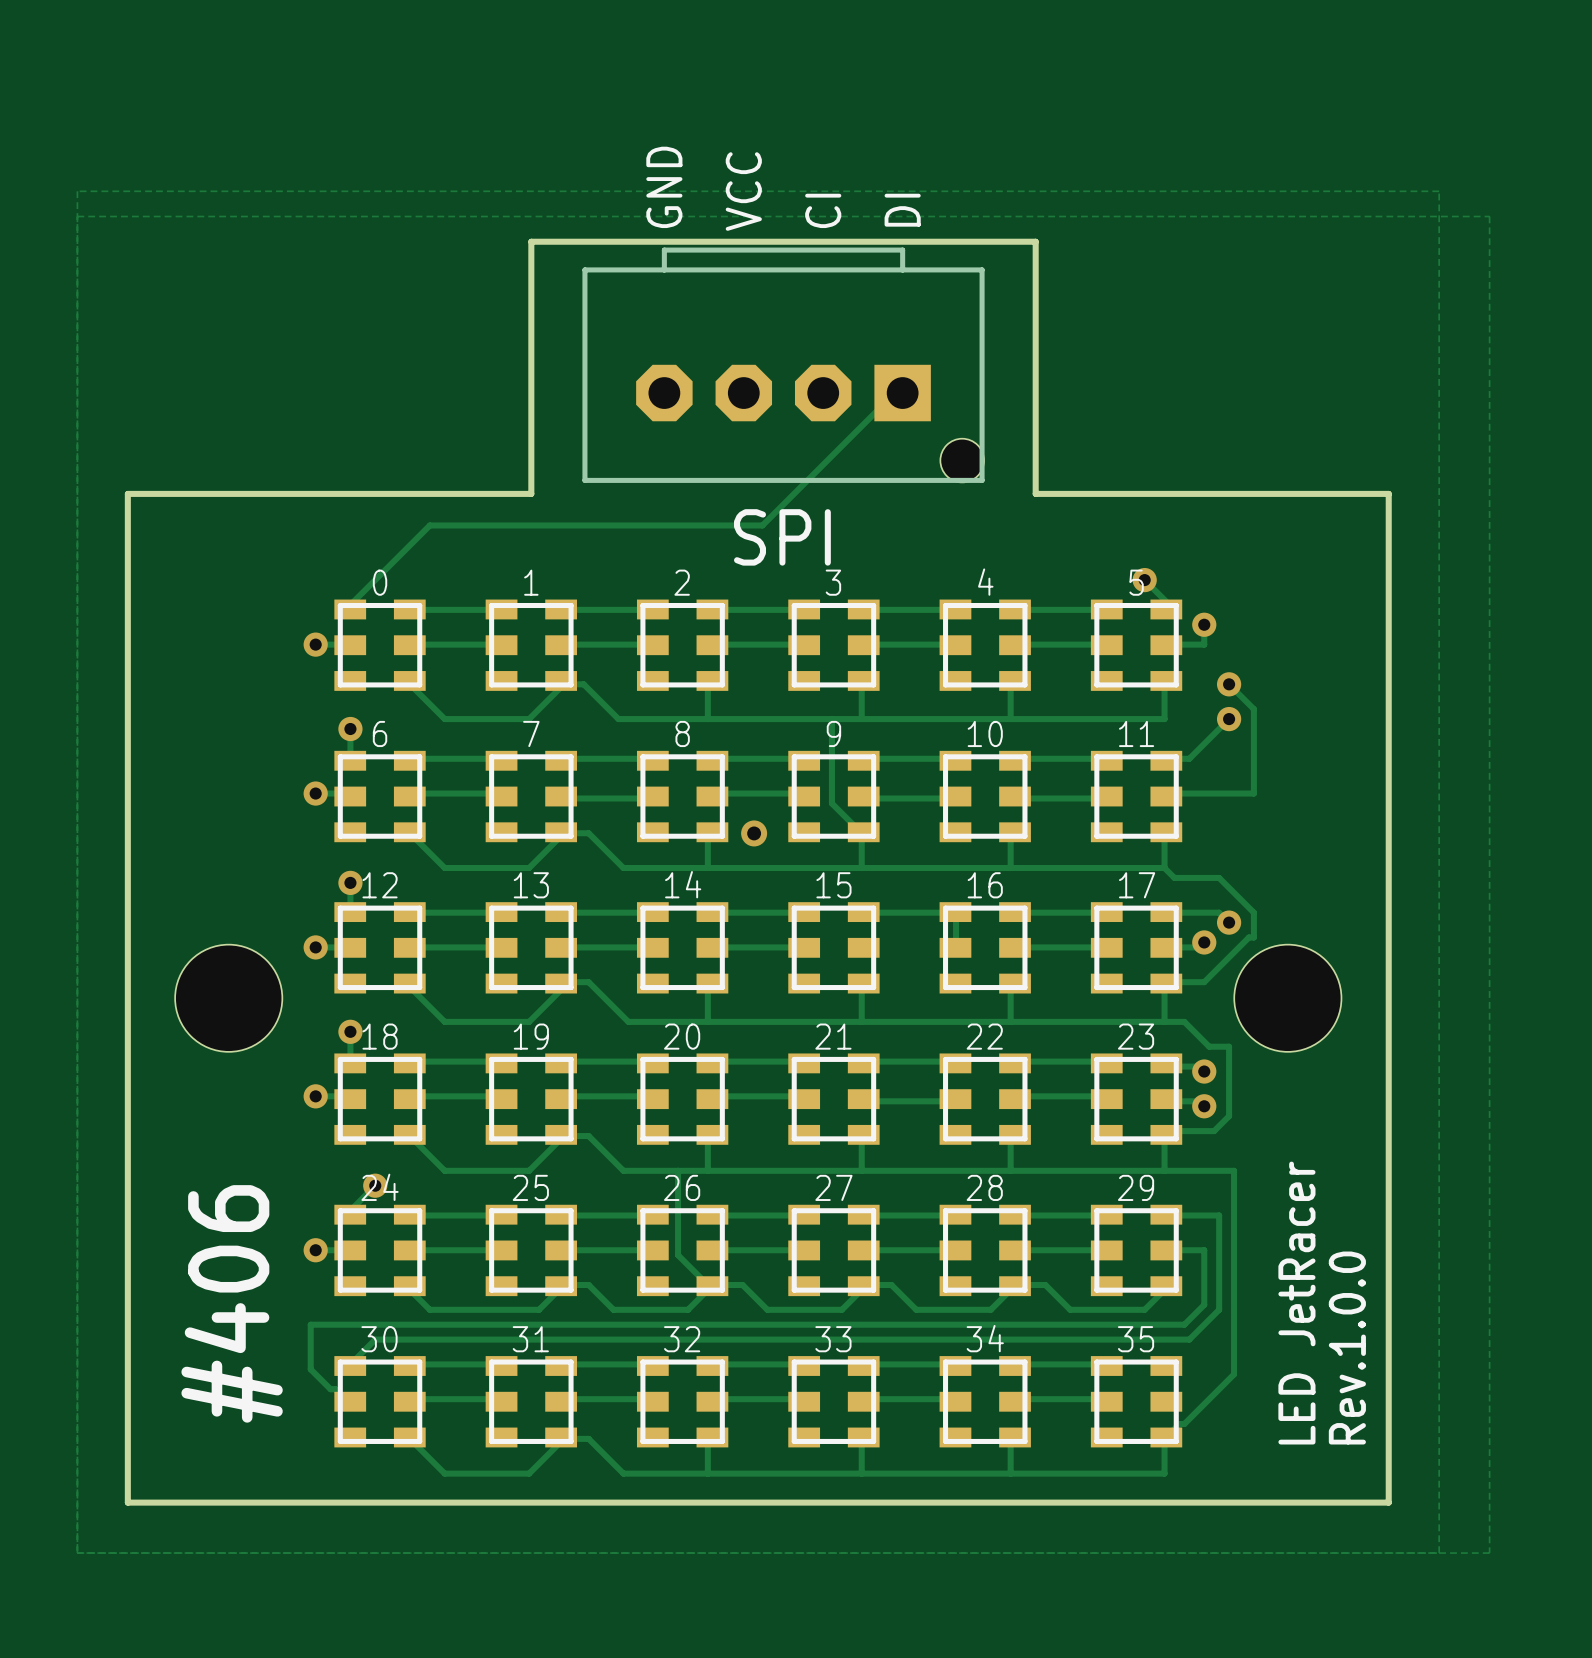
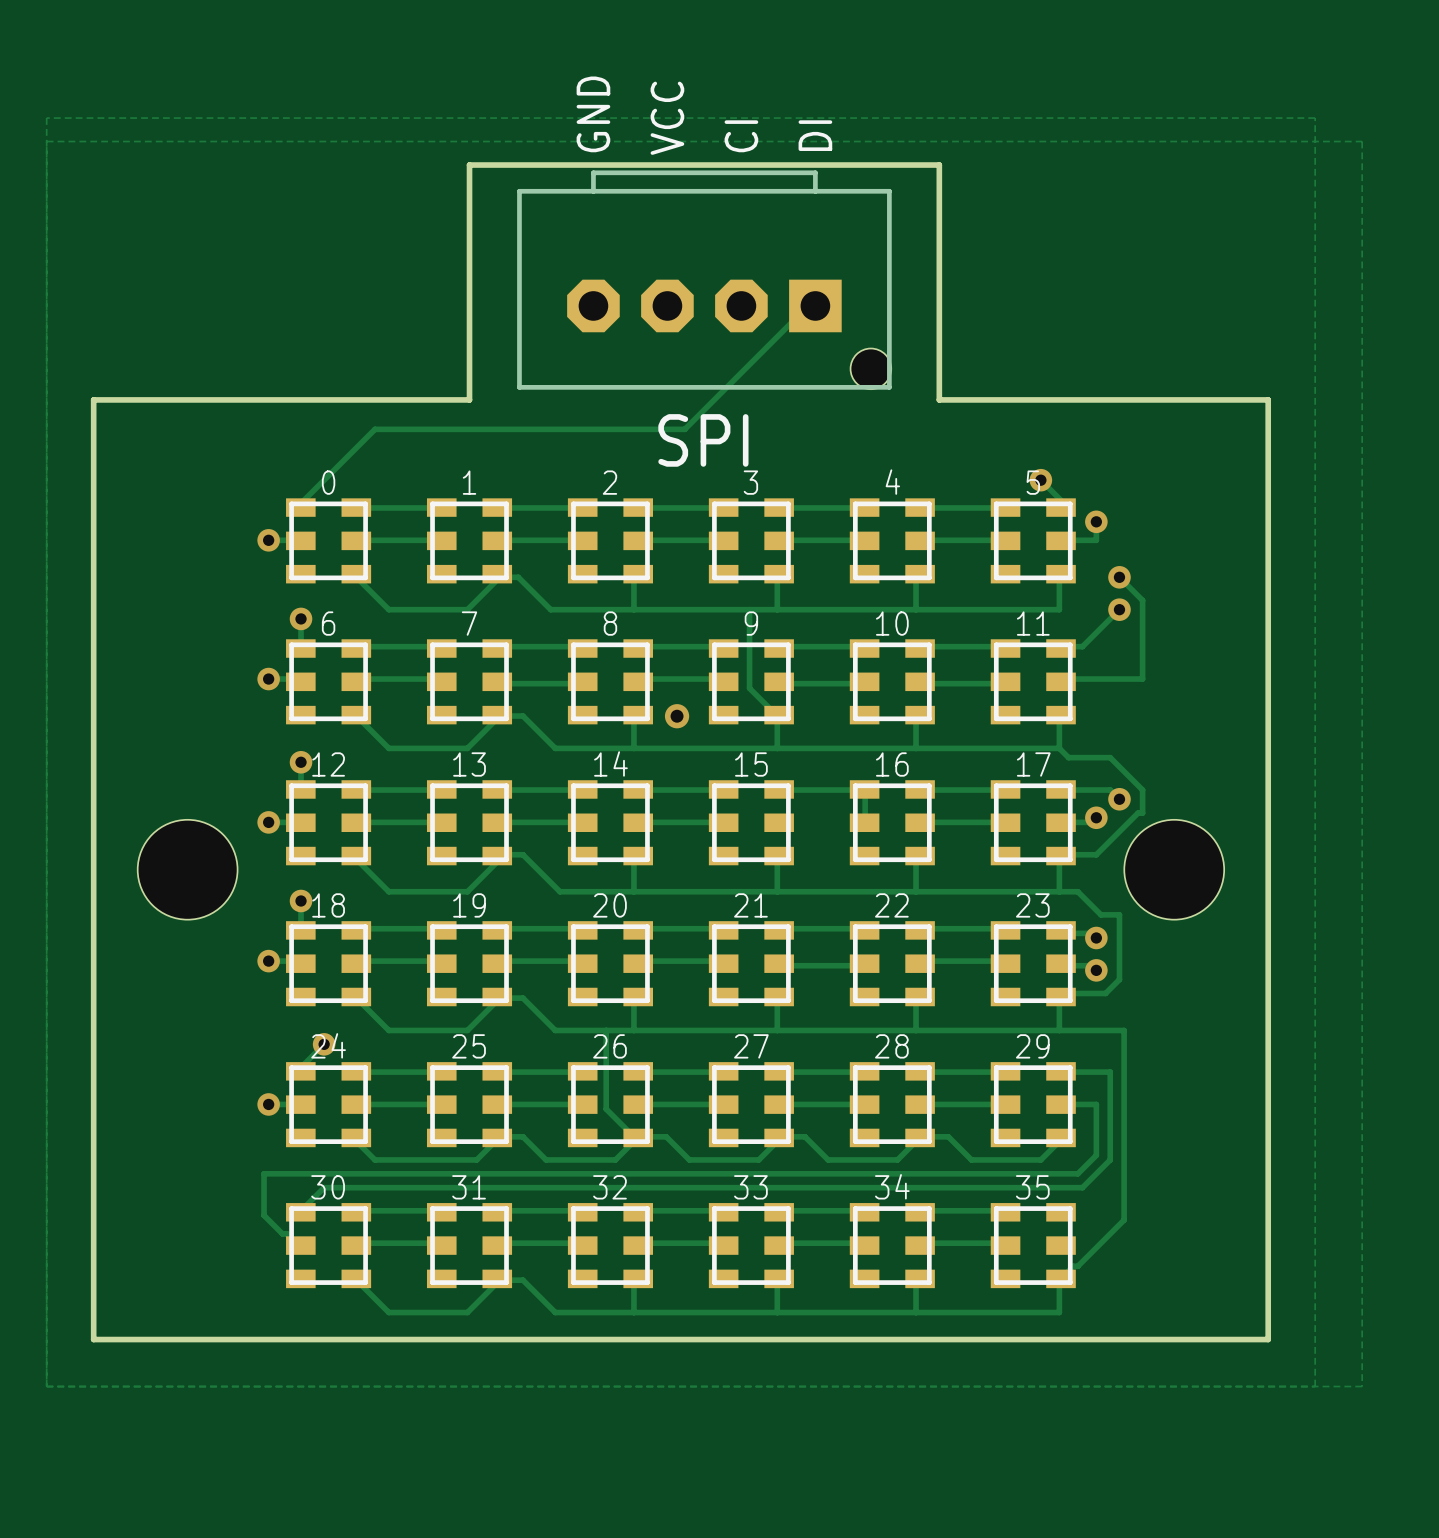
text: #406 (232, 1303) -> none
text: LED JetRacer (1296, 1303) -> none
text: Rev.1.0.0 (1347, 1348) -> none

